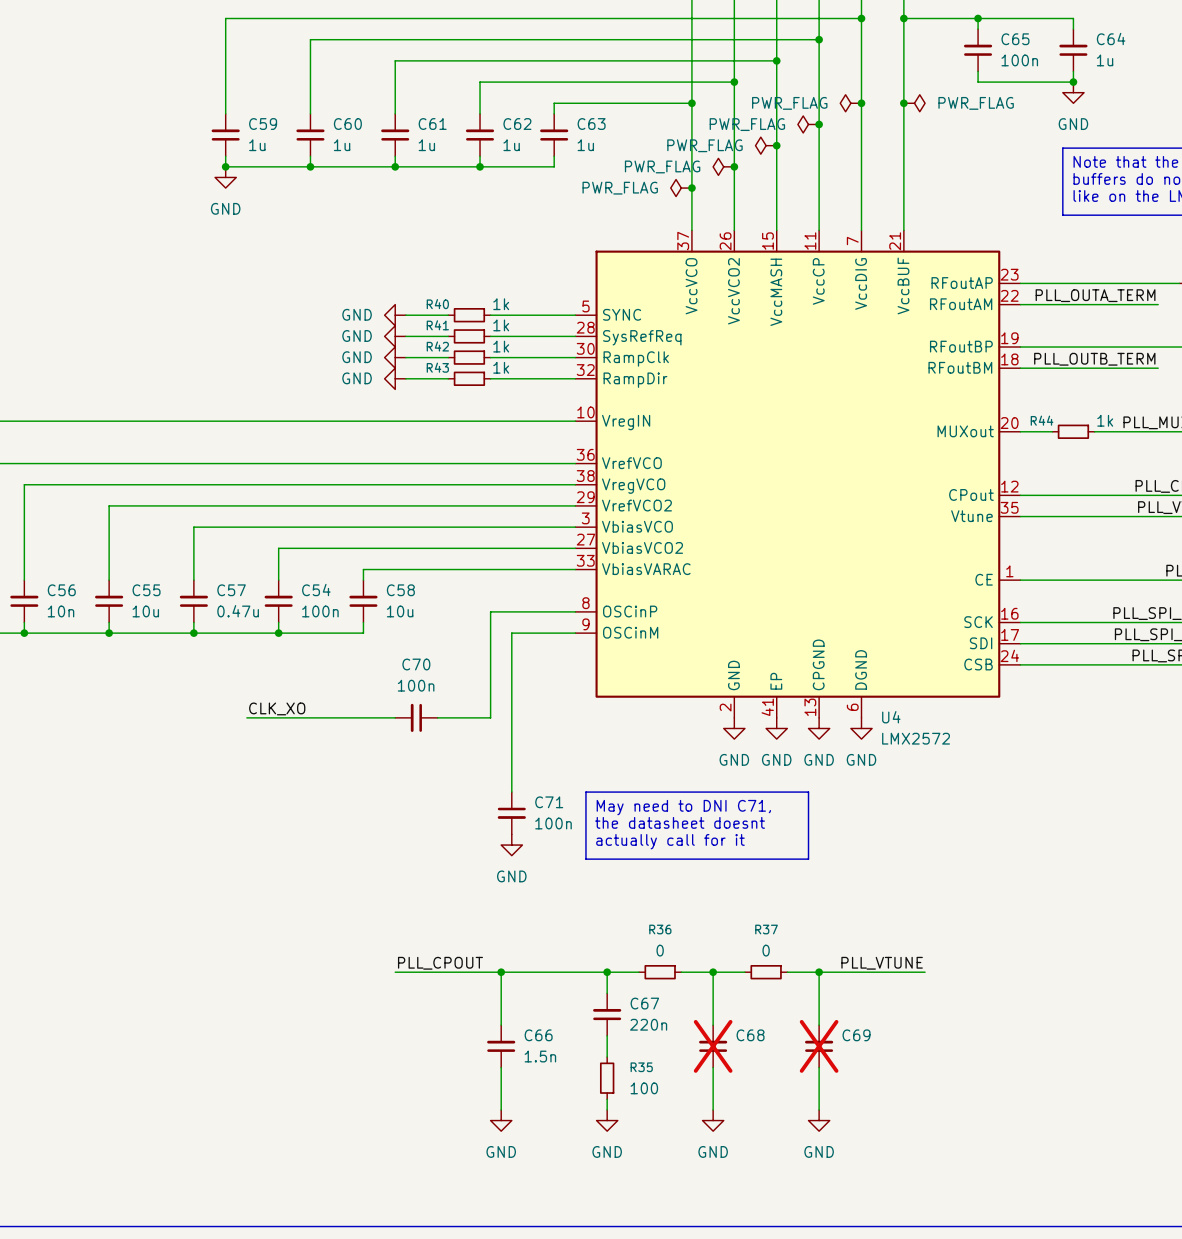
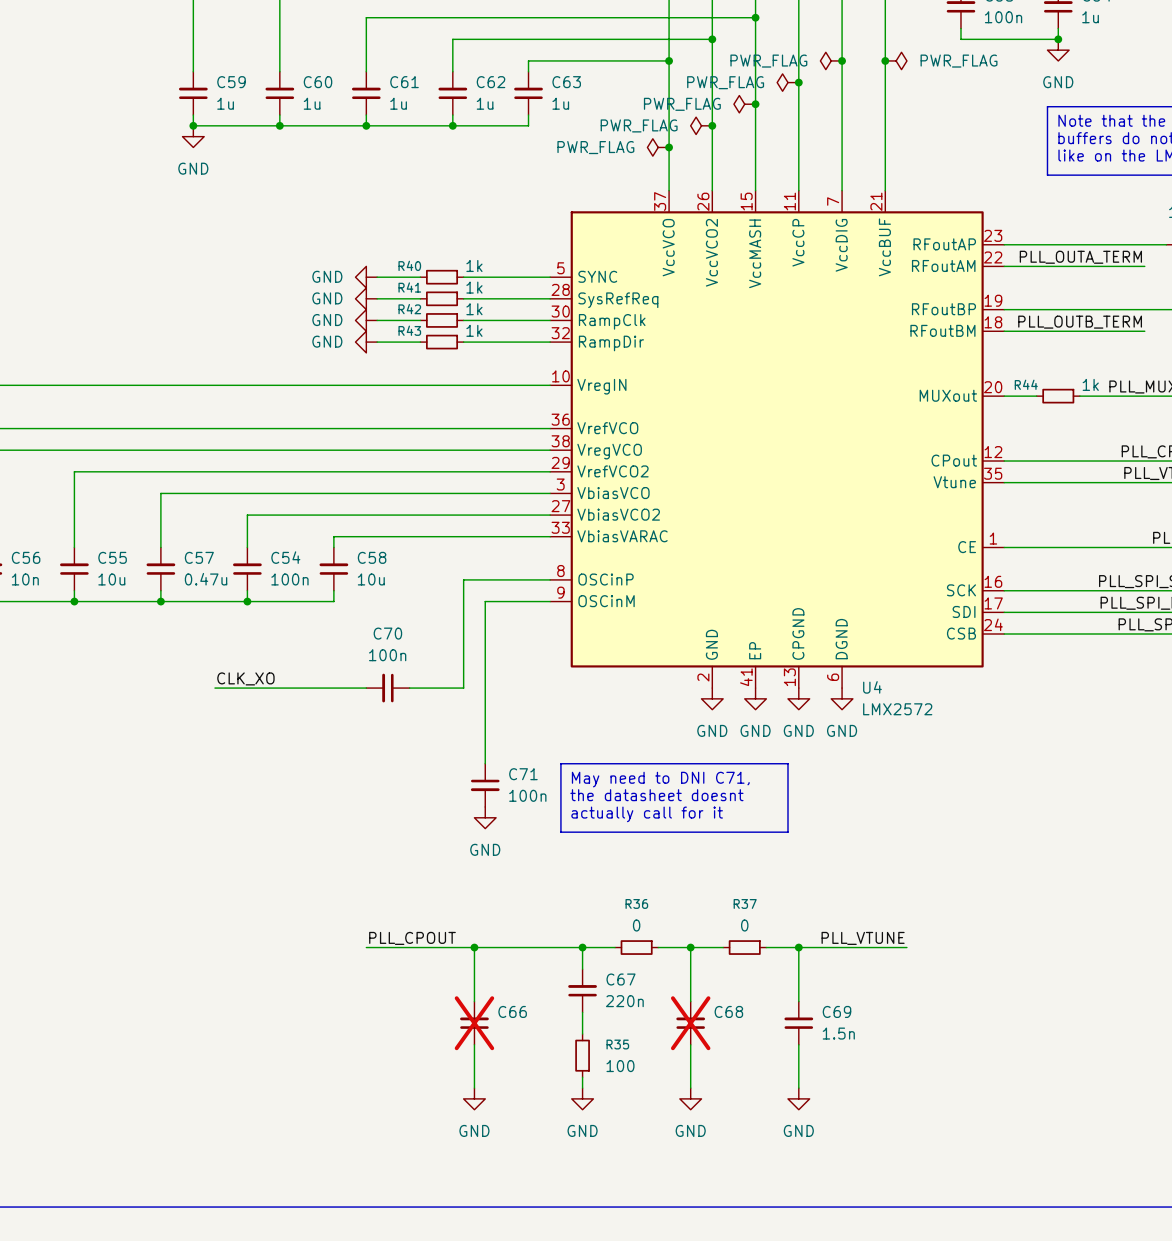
C66 do-not-place cross: none -> (474, 1023)
C69 do-not-place cross: (819, 1046) -> none
C66 value: 1.5n (540, 1056) -> none
C69 value: none -> 1.5n (838, 1033)

